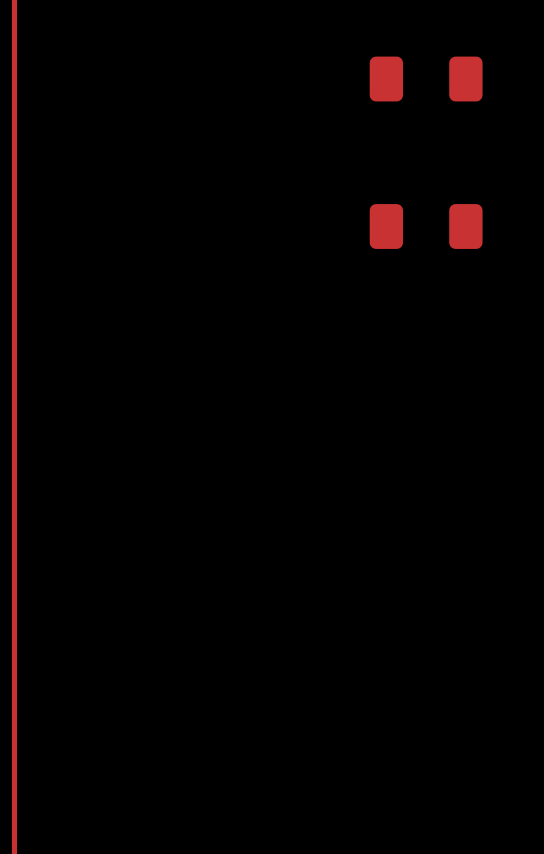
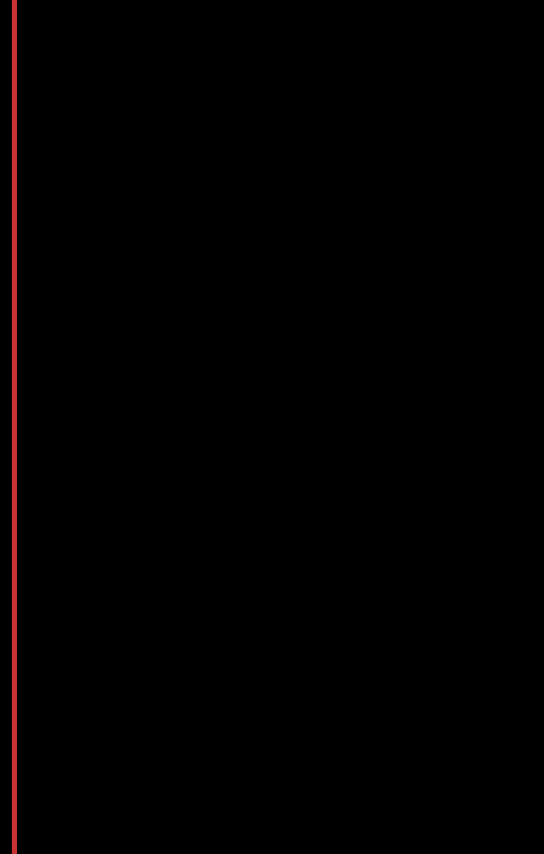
part: (426, 79) -> none
part: (426, 226) -> none

